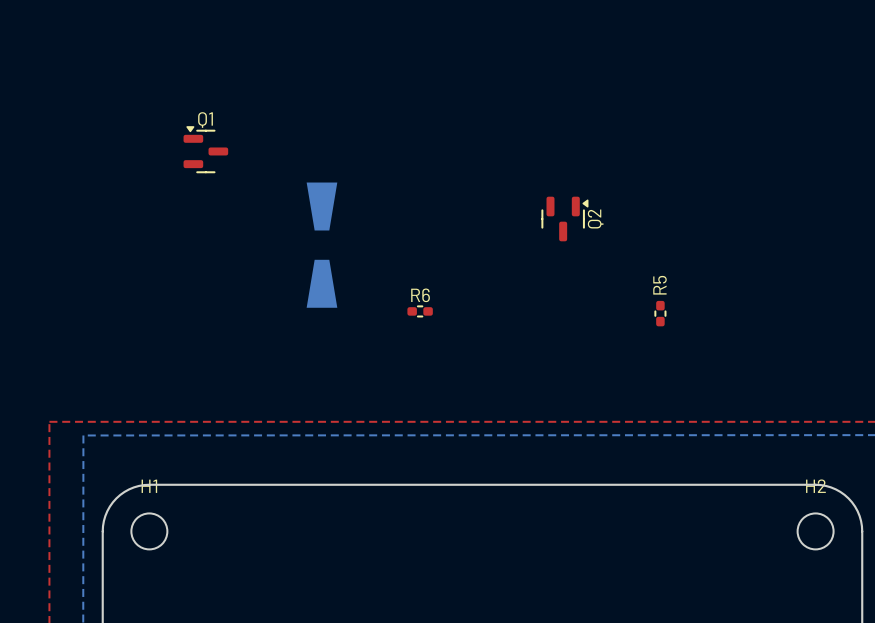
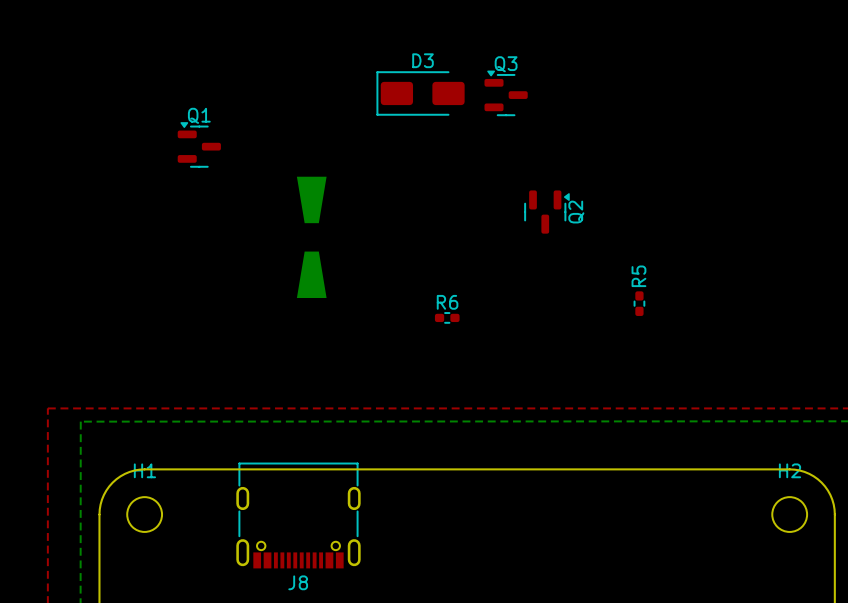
D3: none -> (420, 93)
Q3: none -> (506, 93)
R6 position: (420, 311) -> (447, 317)
J8: none -> (298, 515)

